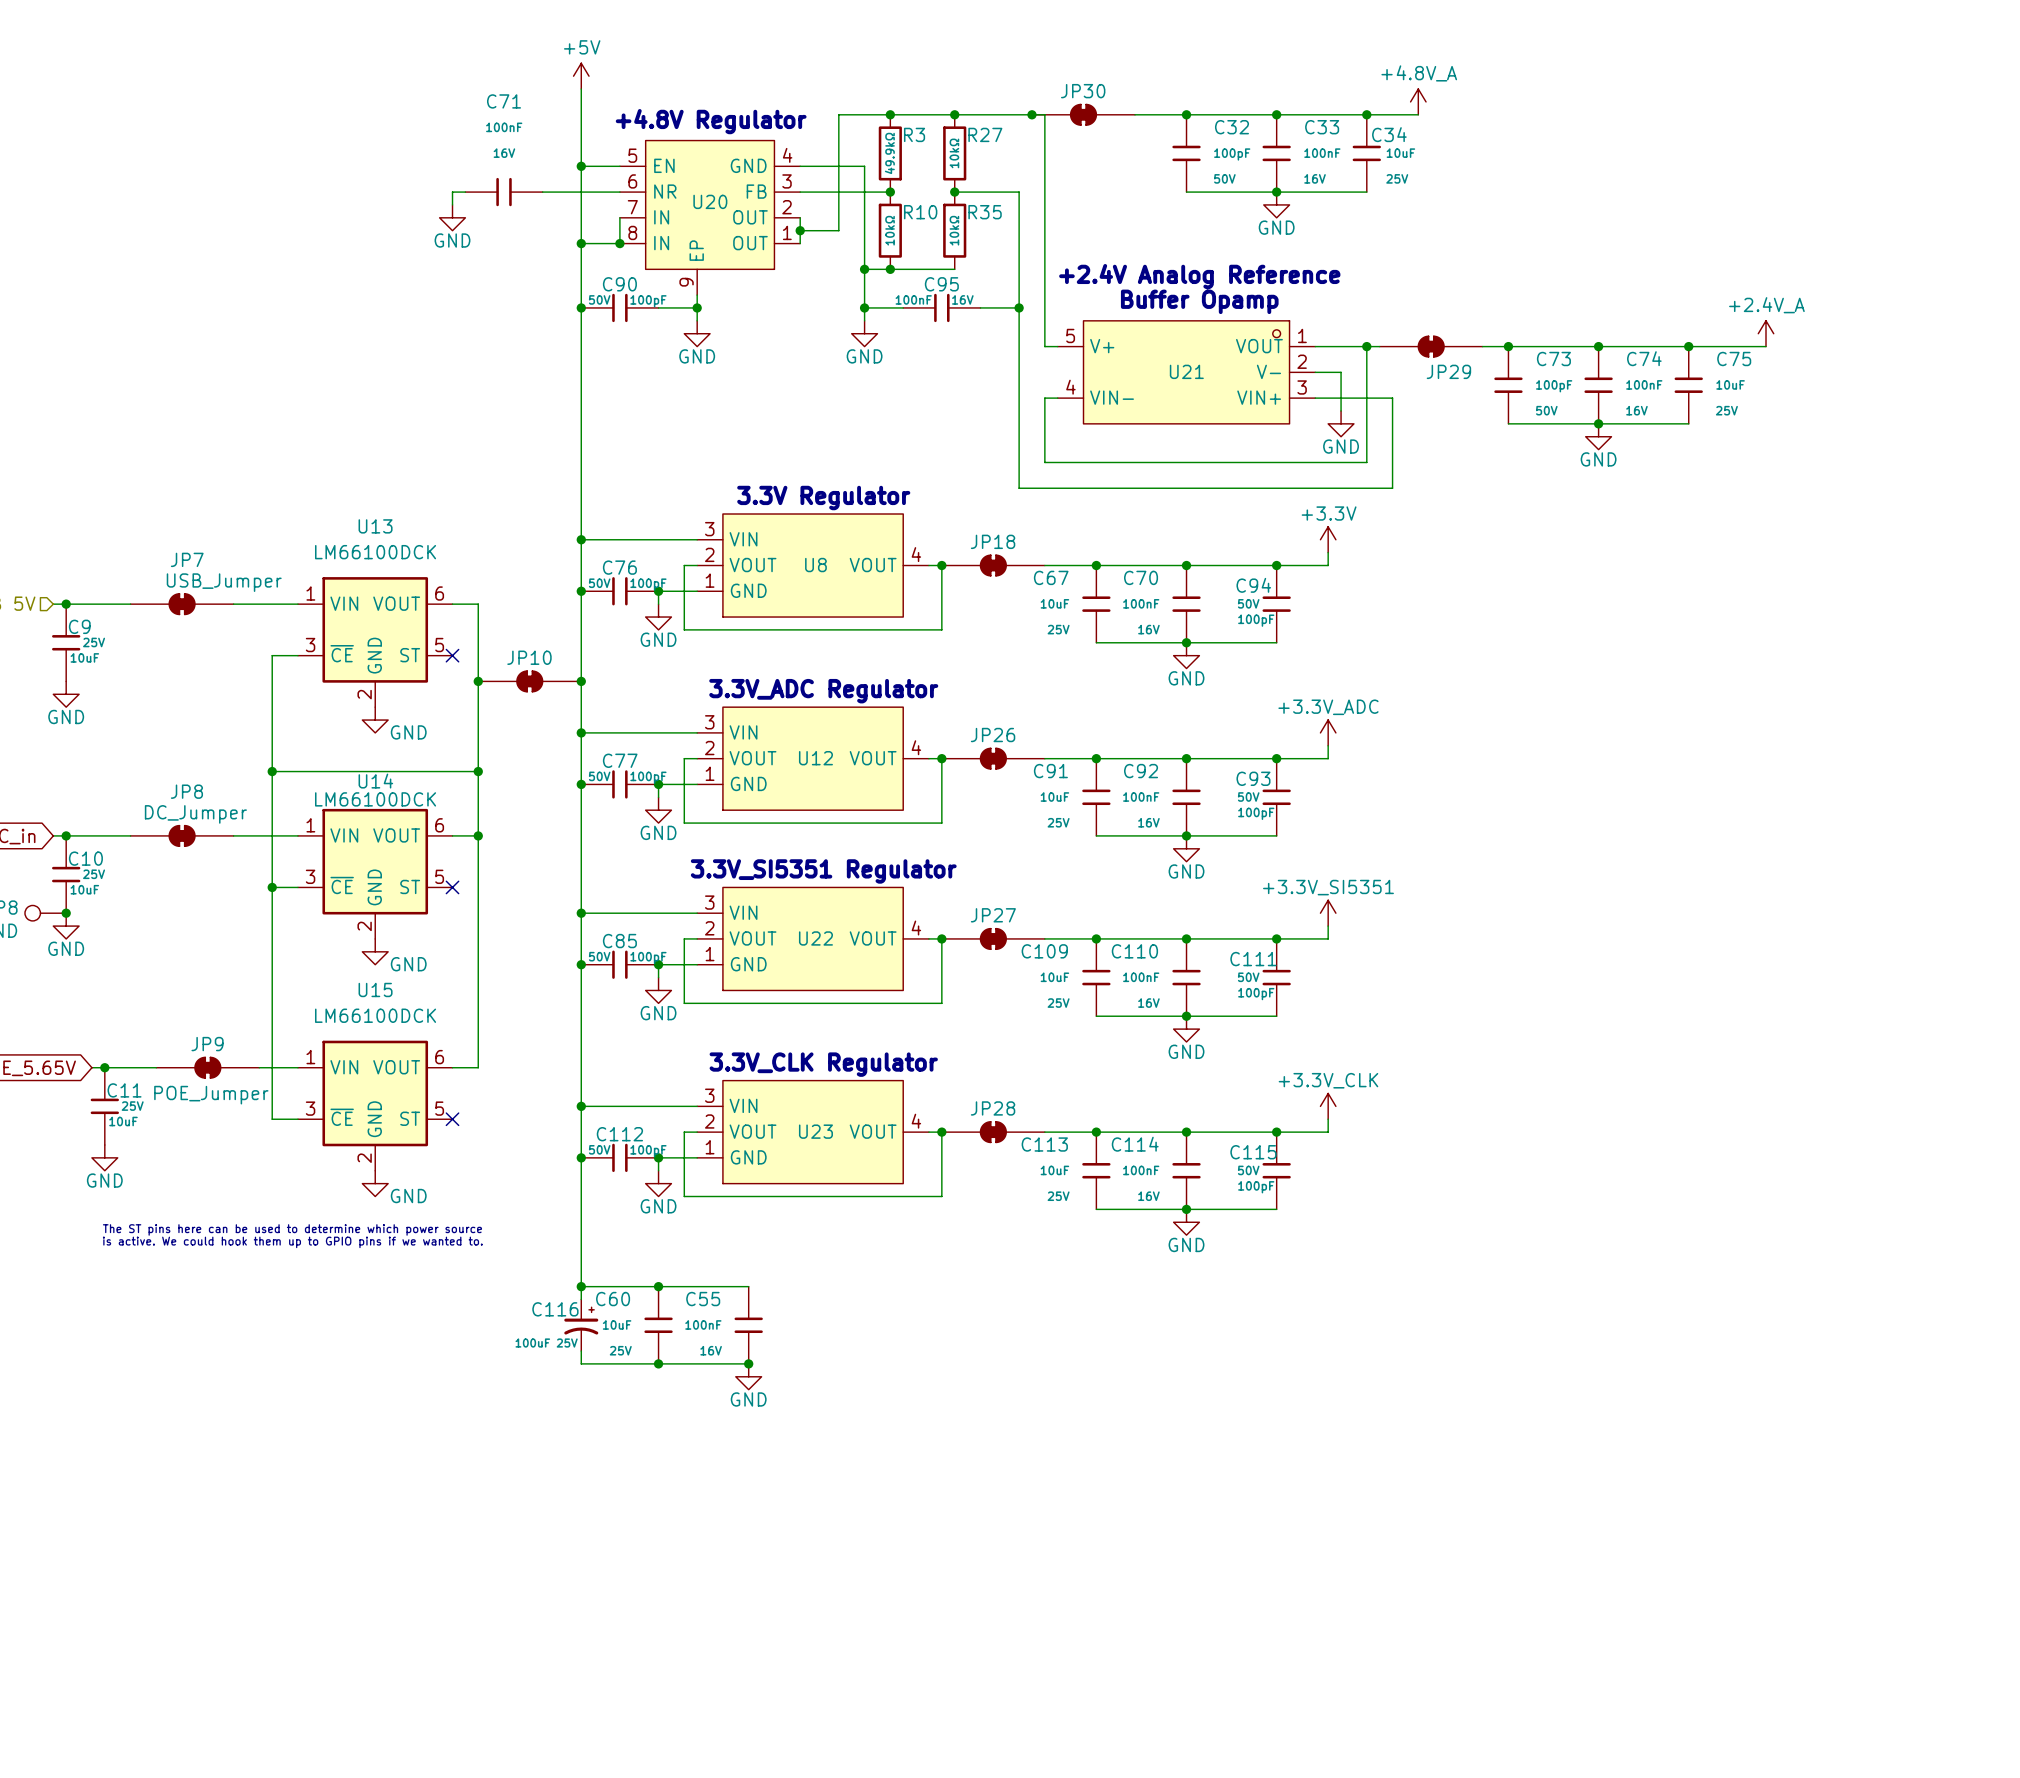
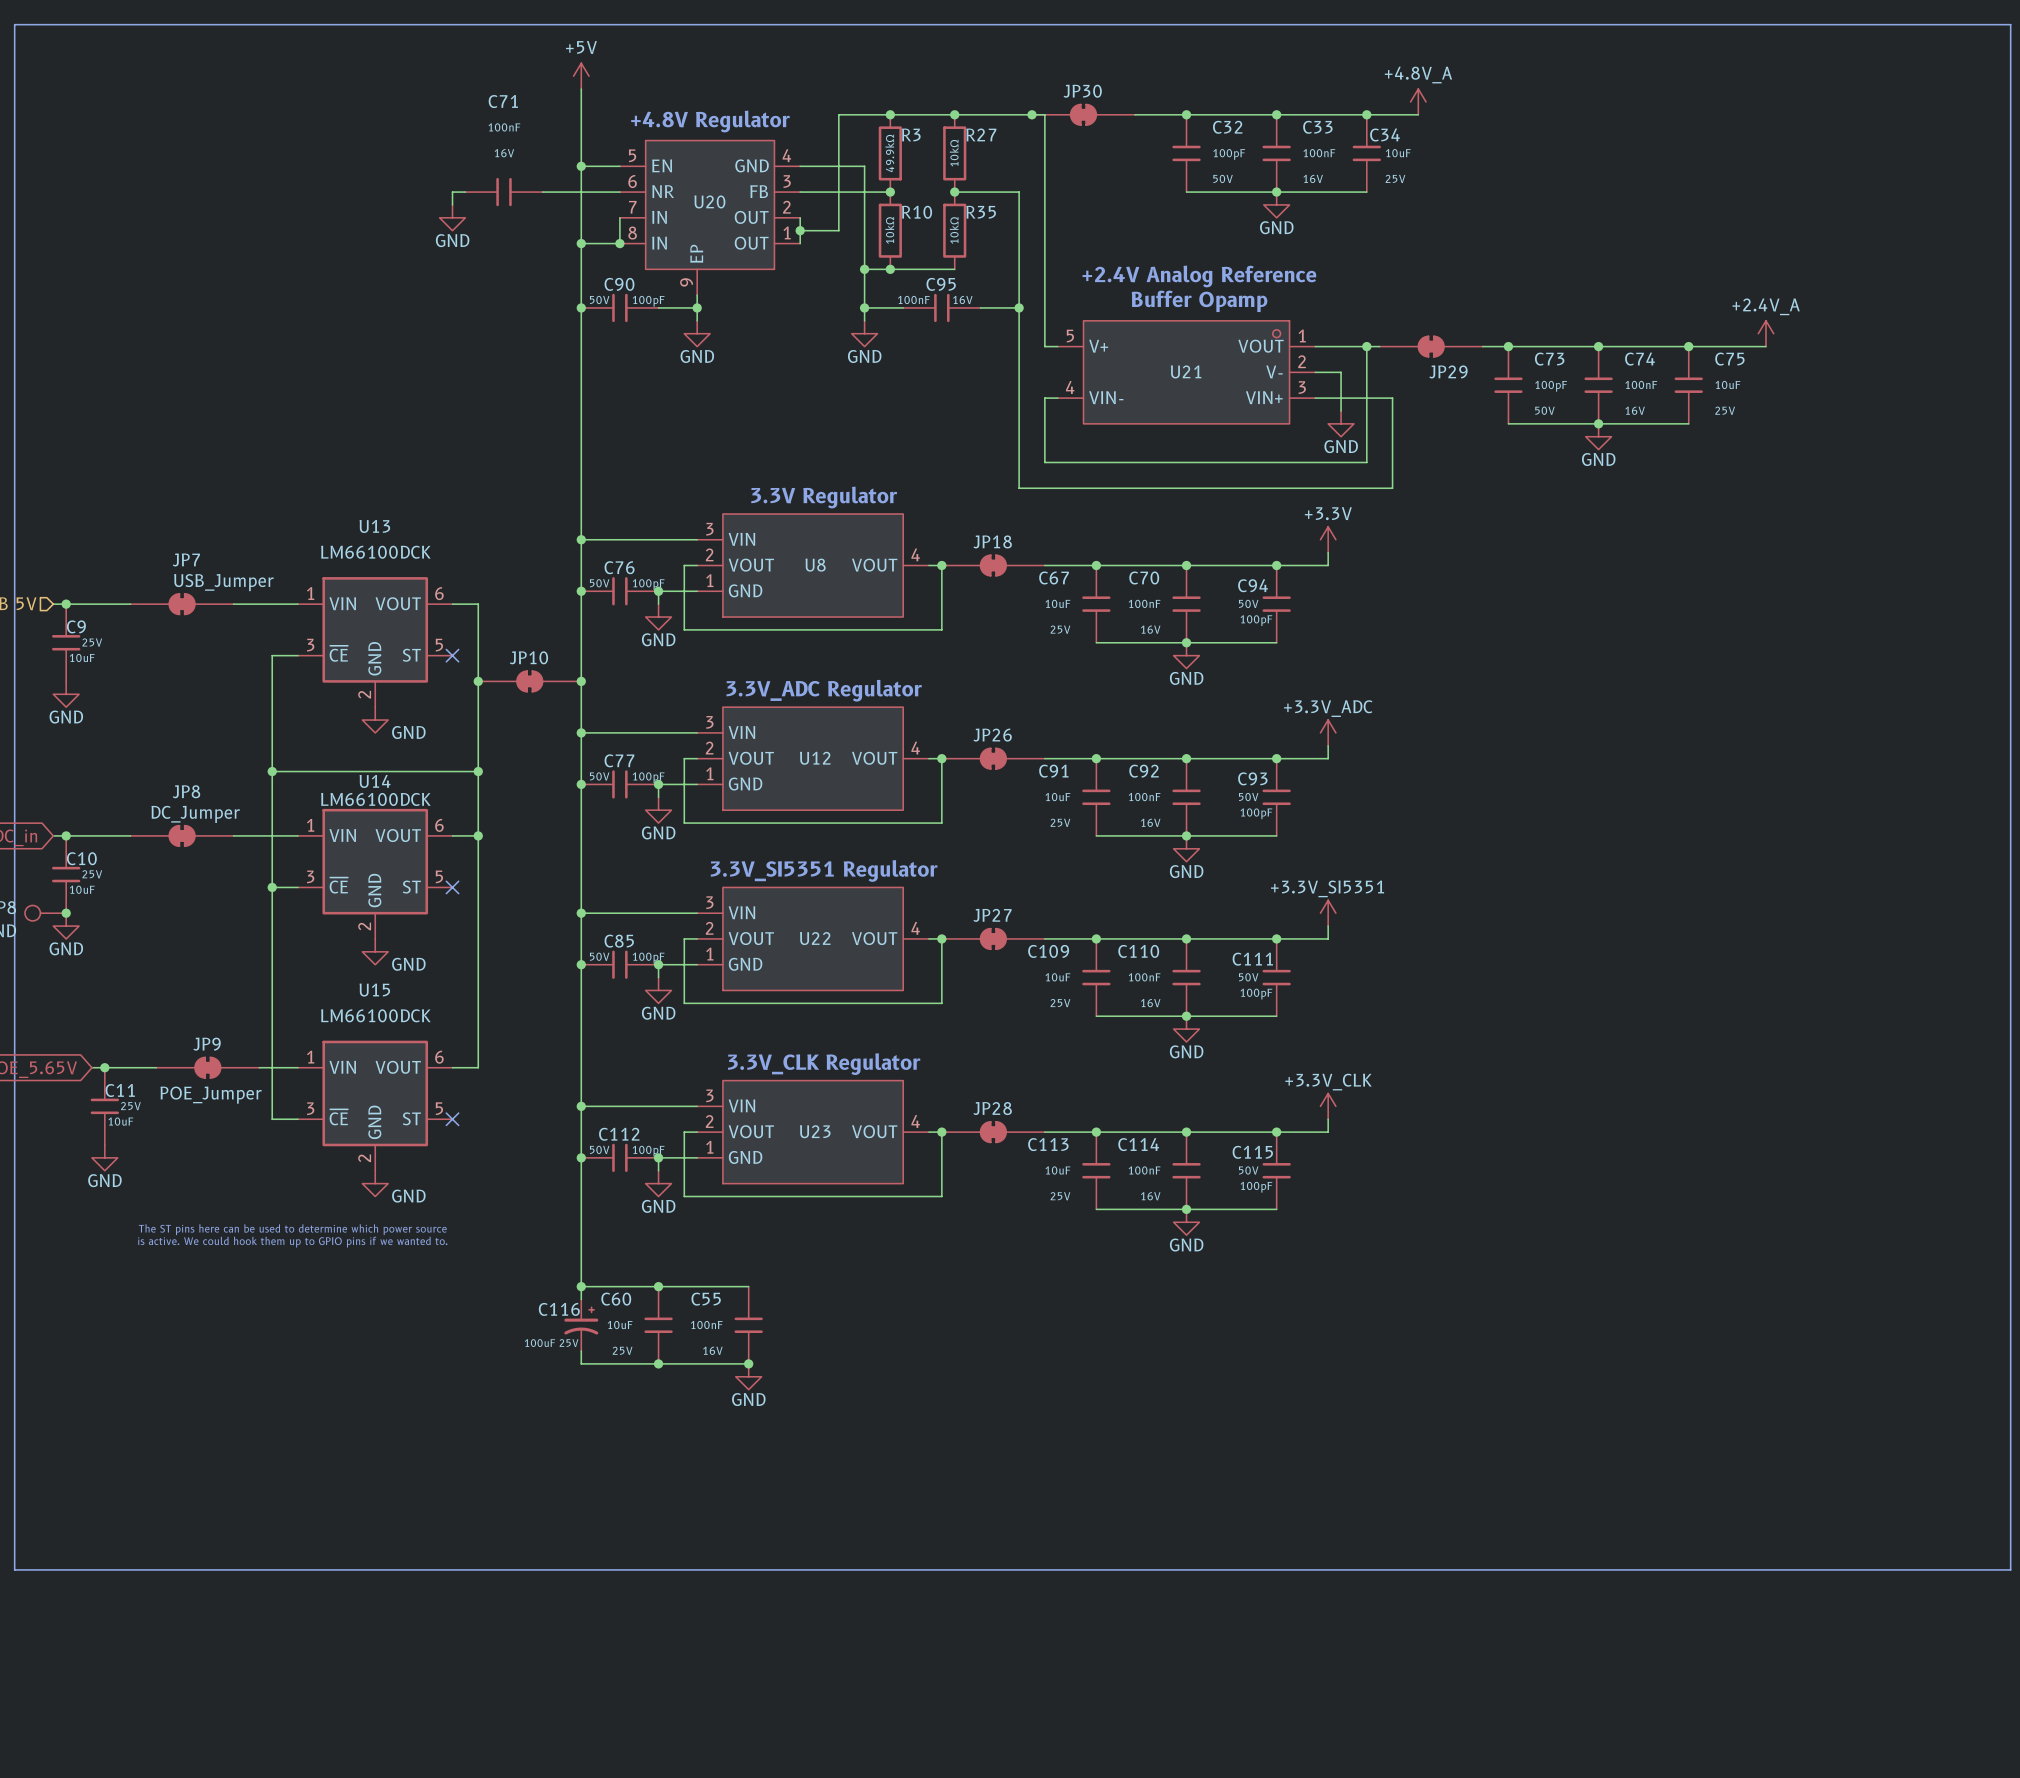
line: none -> (14, 24) (2010, 24) (2010, 1569) (14, 1569) (14, 24)

